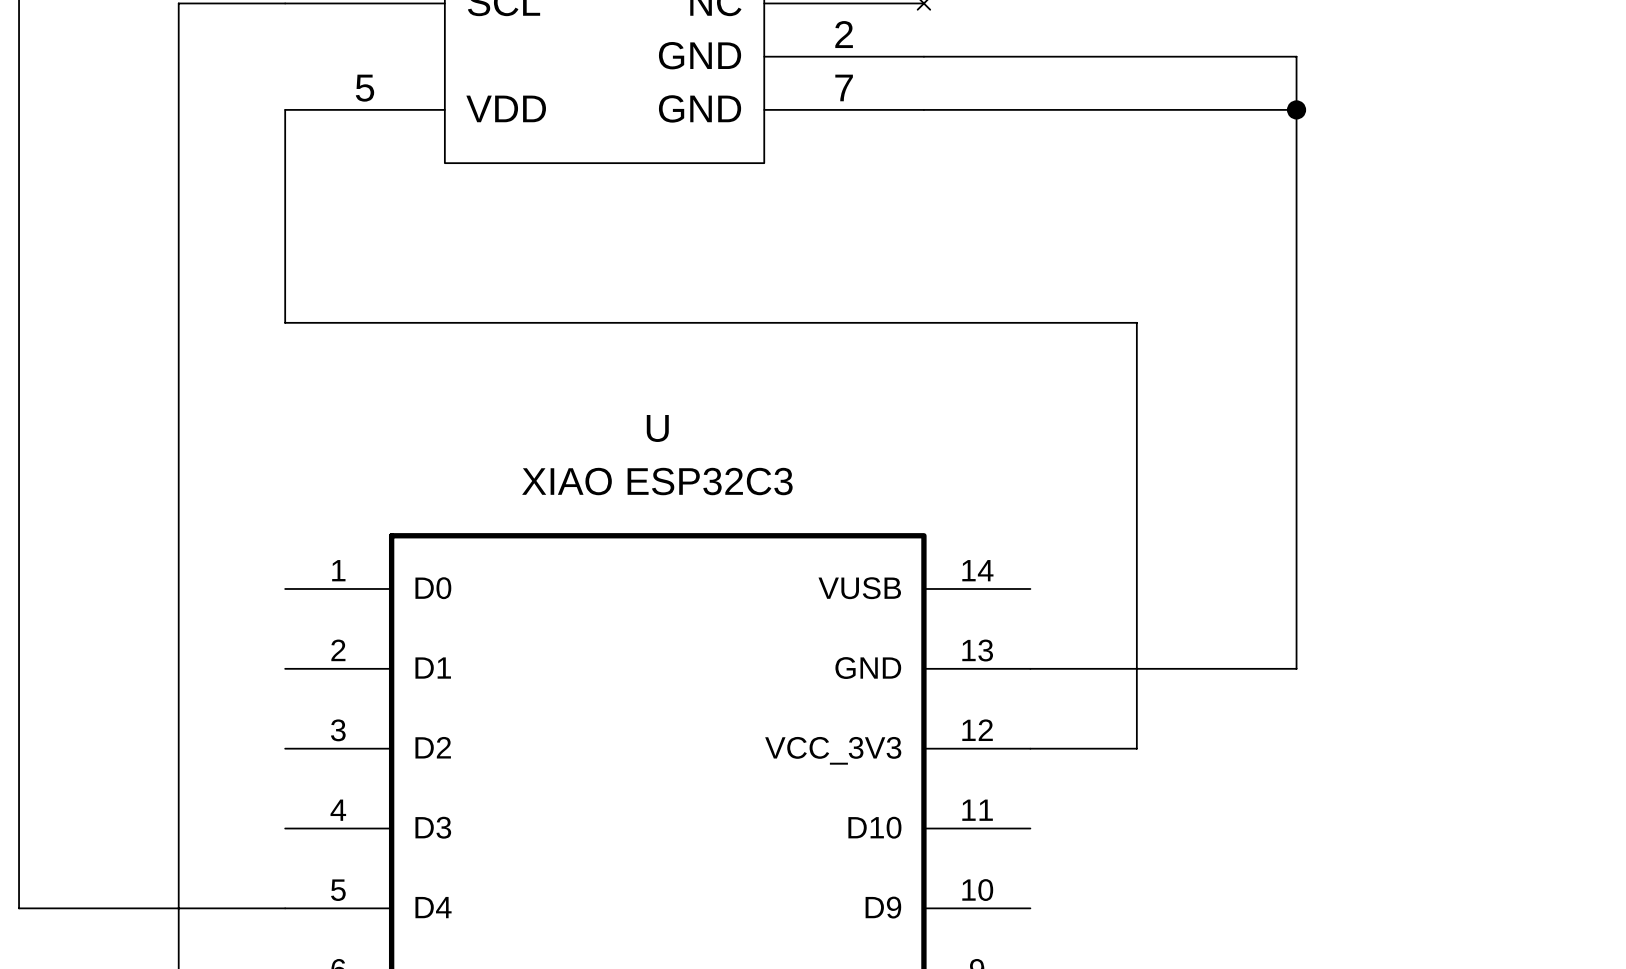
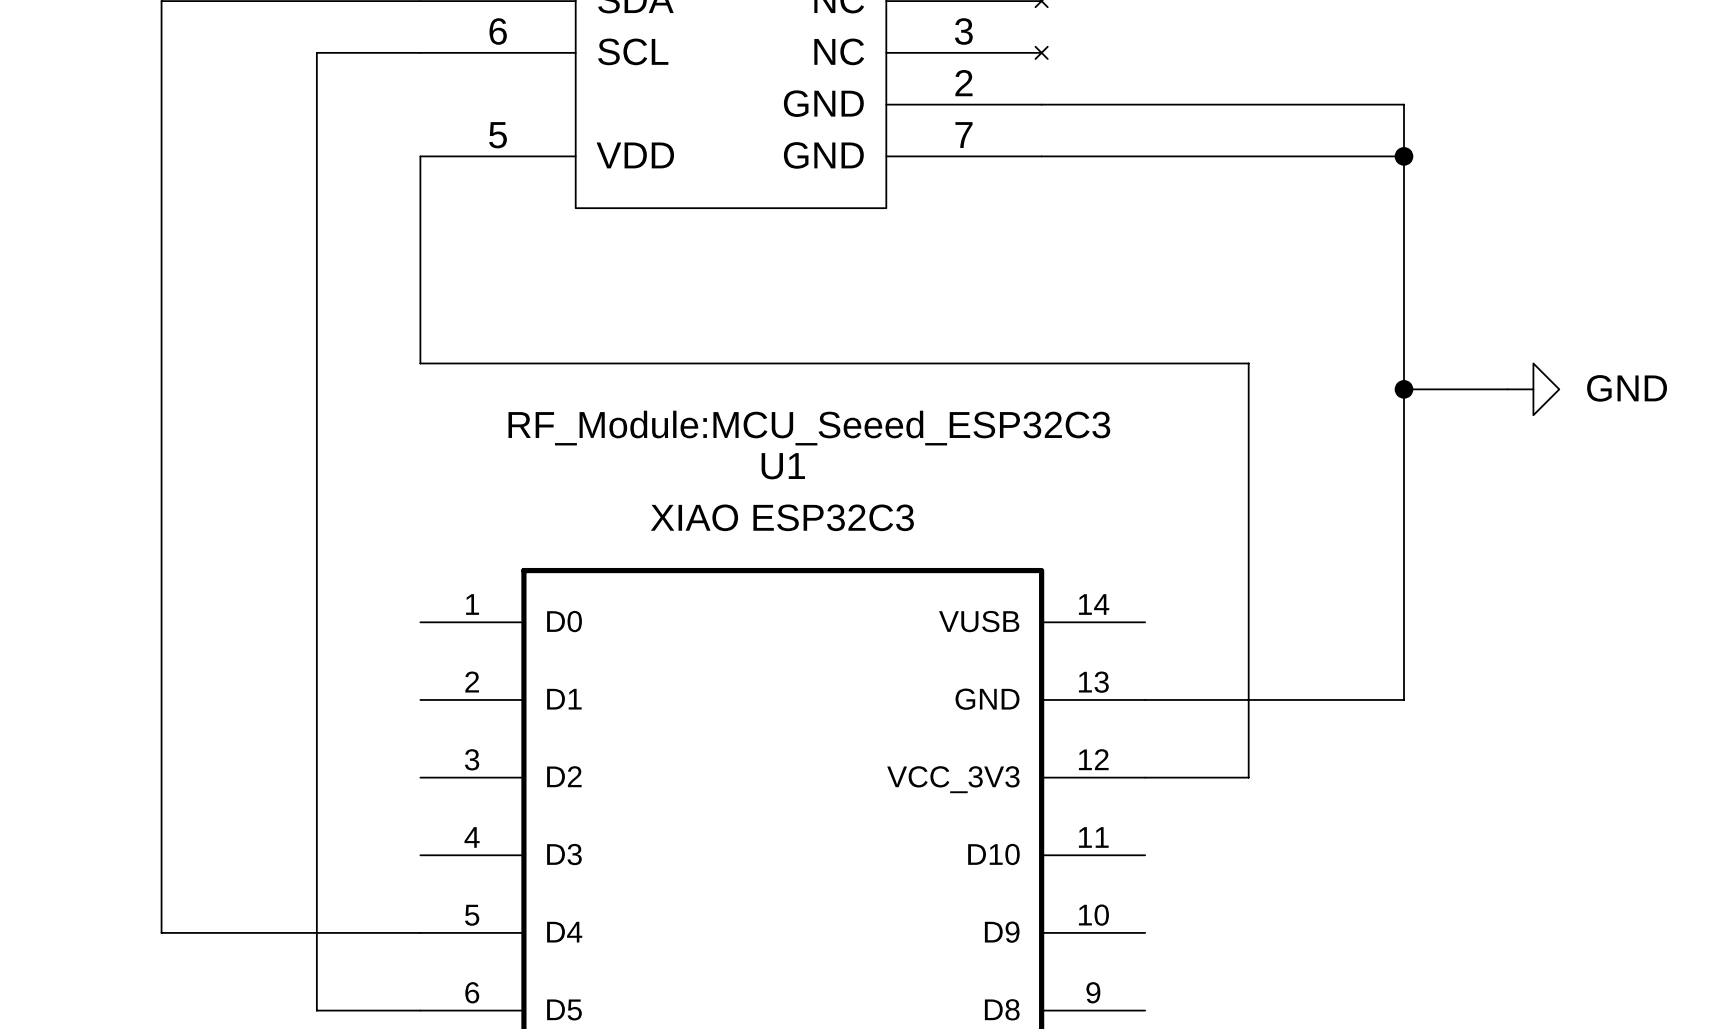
wire: none -> (1404, 389) (1507, 389)
junction: none -> (1404, 389)
power symbol: none -> GND (1533, 389)
U text: none -> RF_Module:MCU_Seeed_ESP32C3 (809, 428)
U name: U (657, 428) -> U1 (783, 466)

